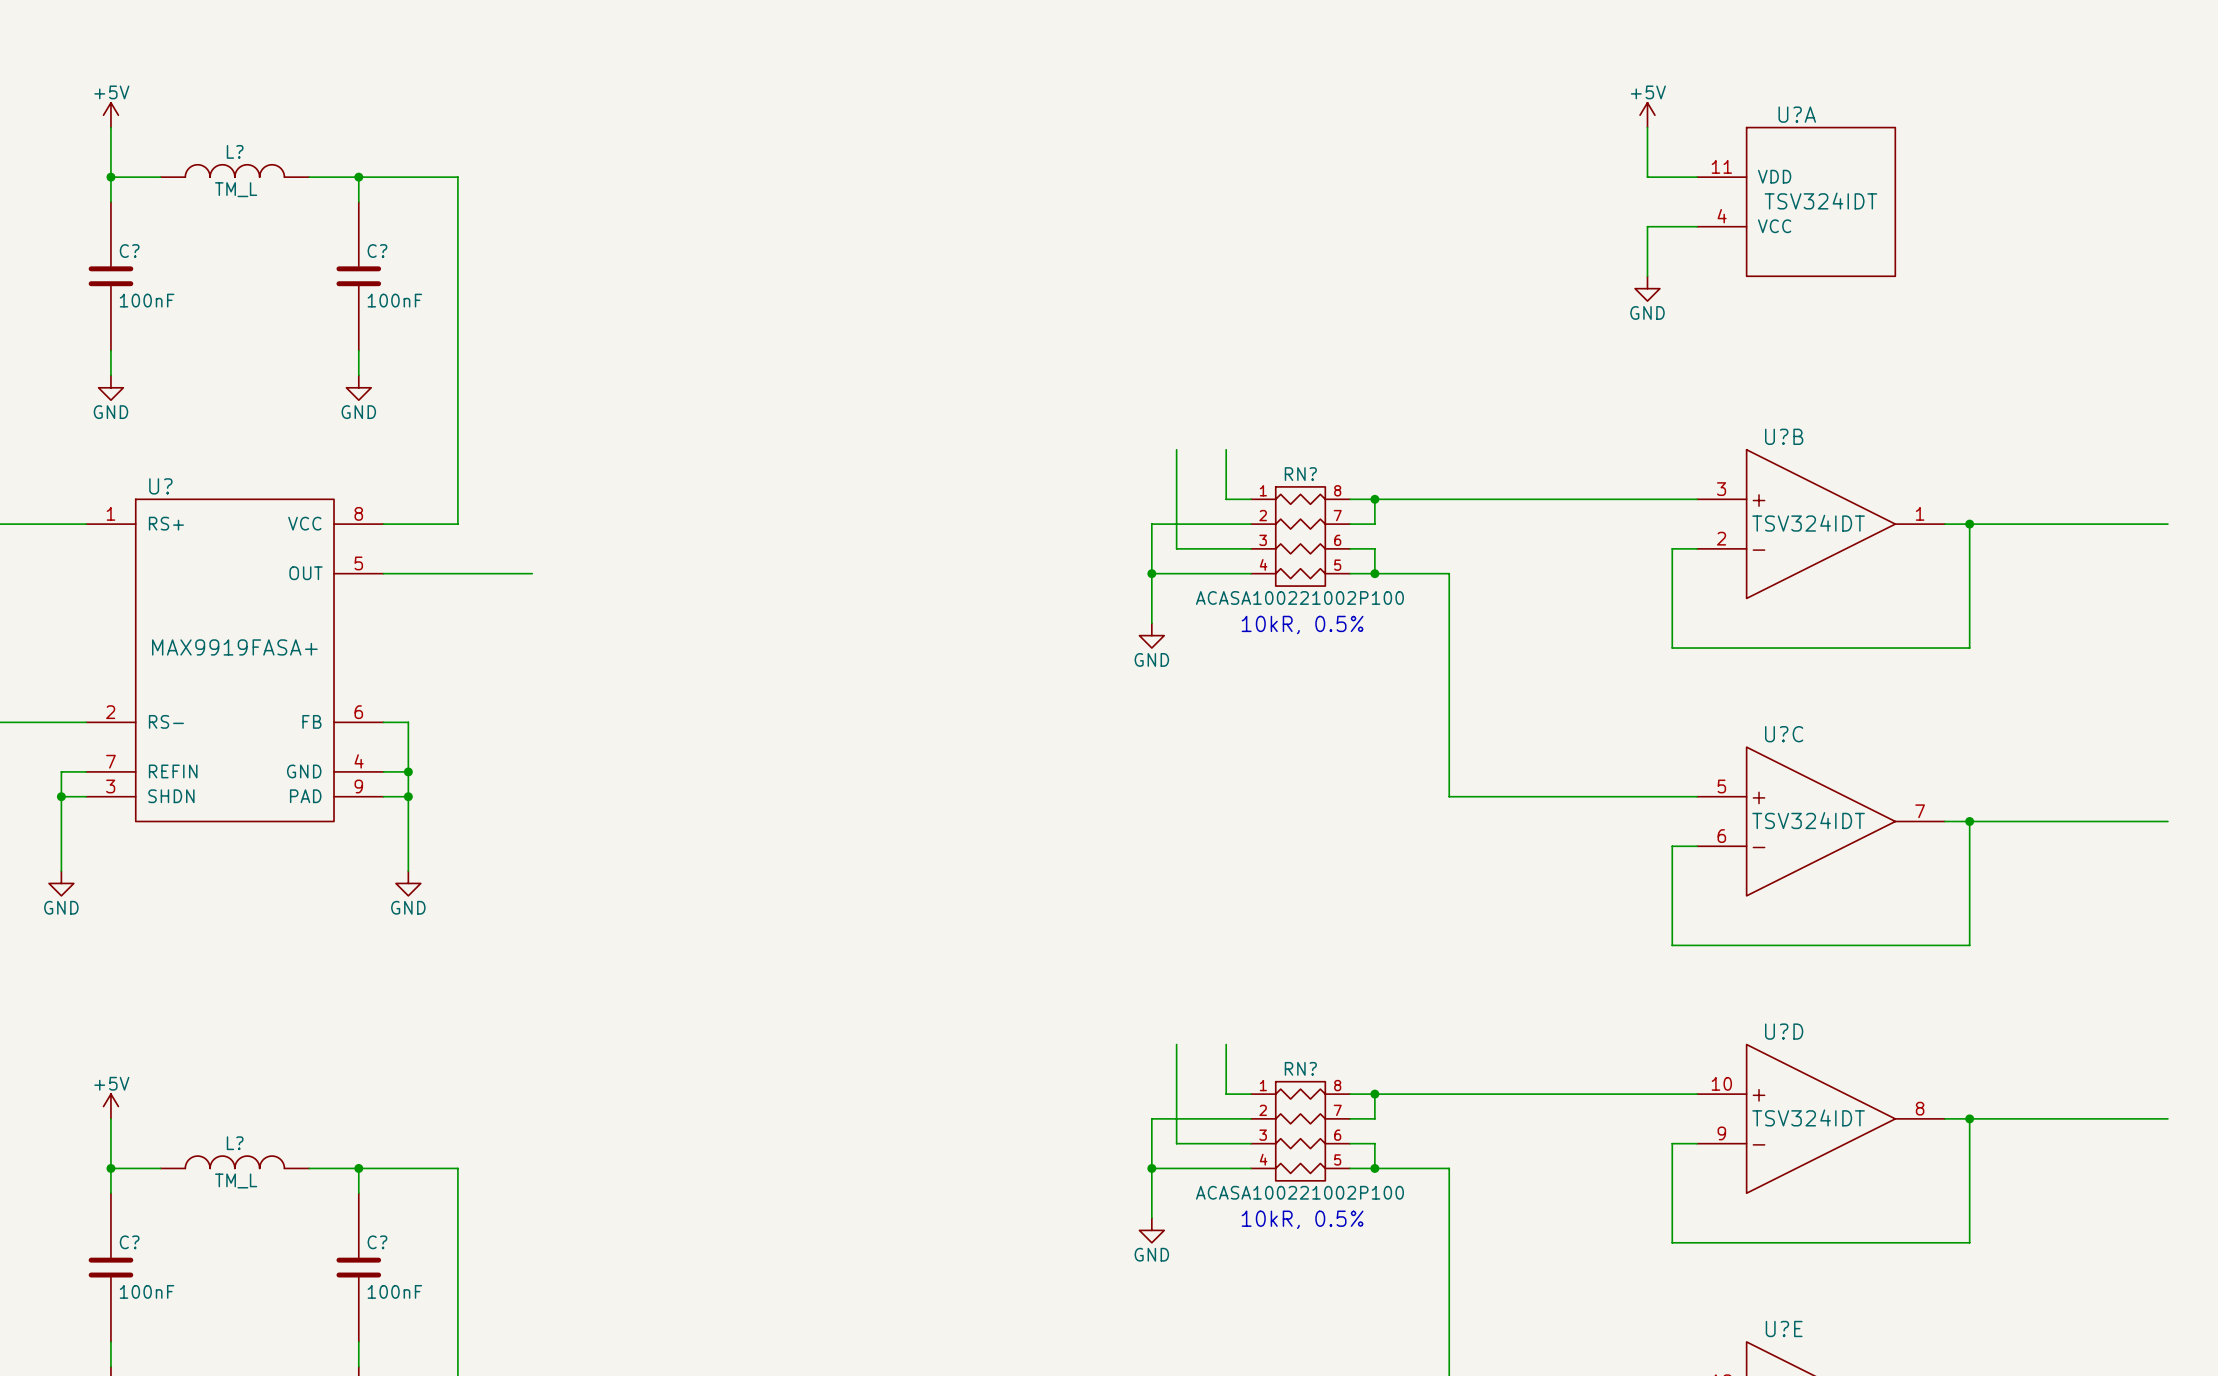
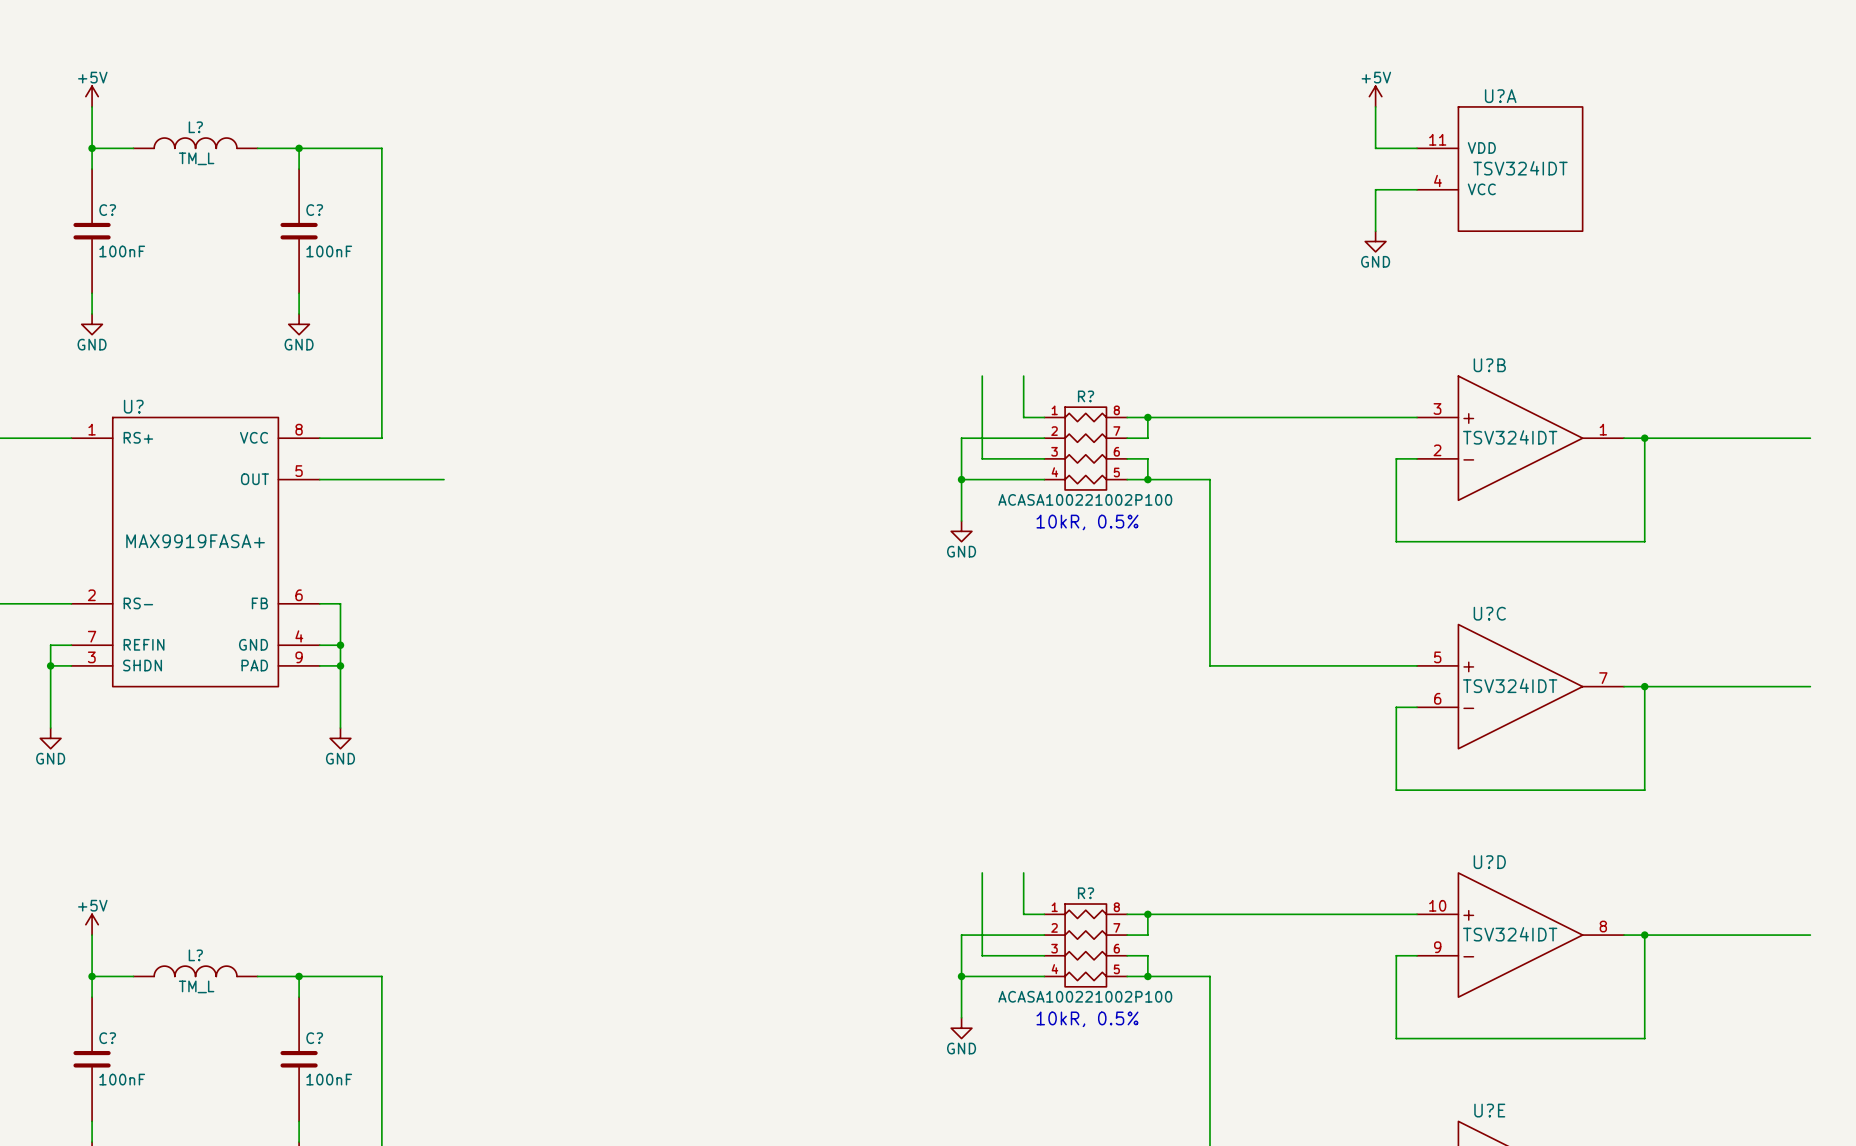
RN? name: RN? (1300, 474) -> R? (1086, 396)
RN? name: RN? (1300, 1068) -> R? (1086, 893)

